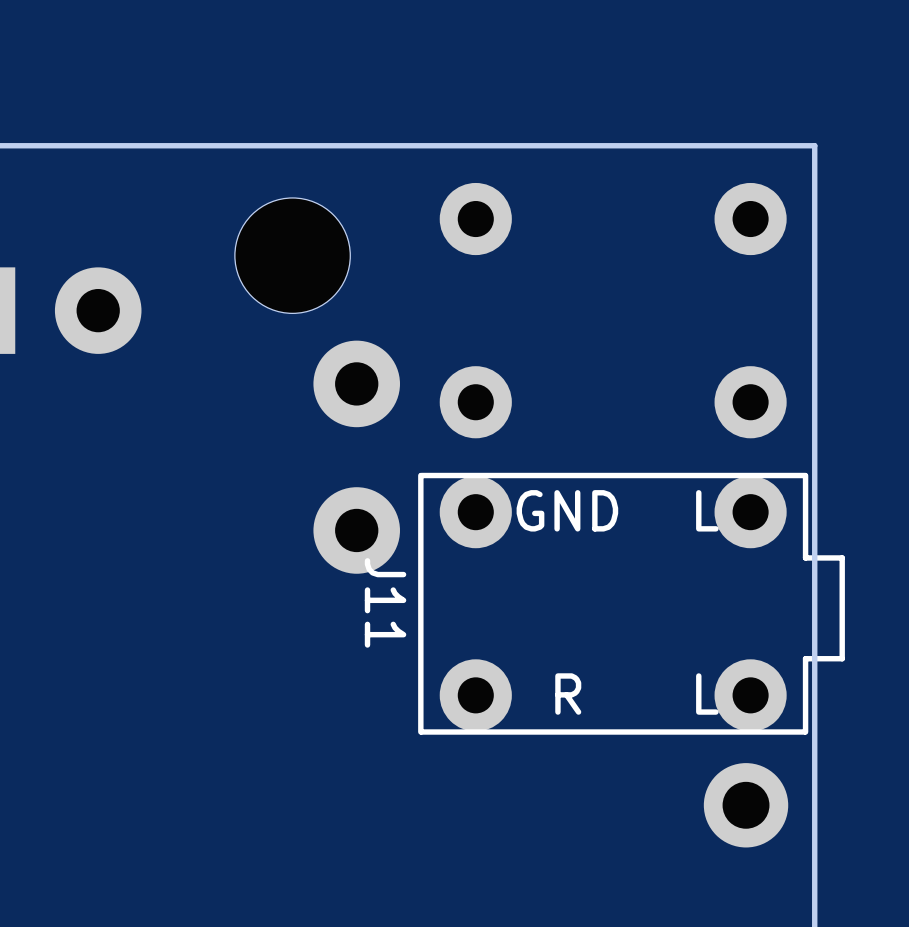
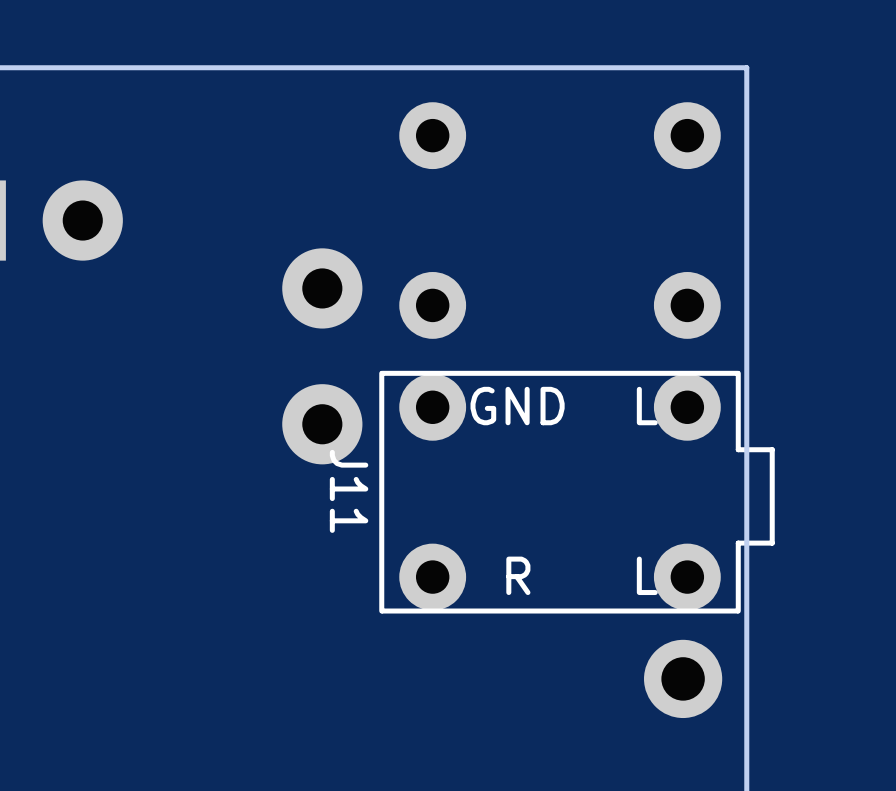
part: (292, 255) -> none

